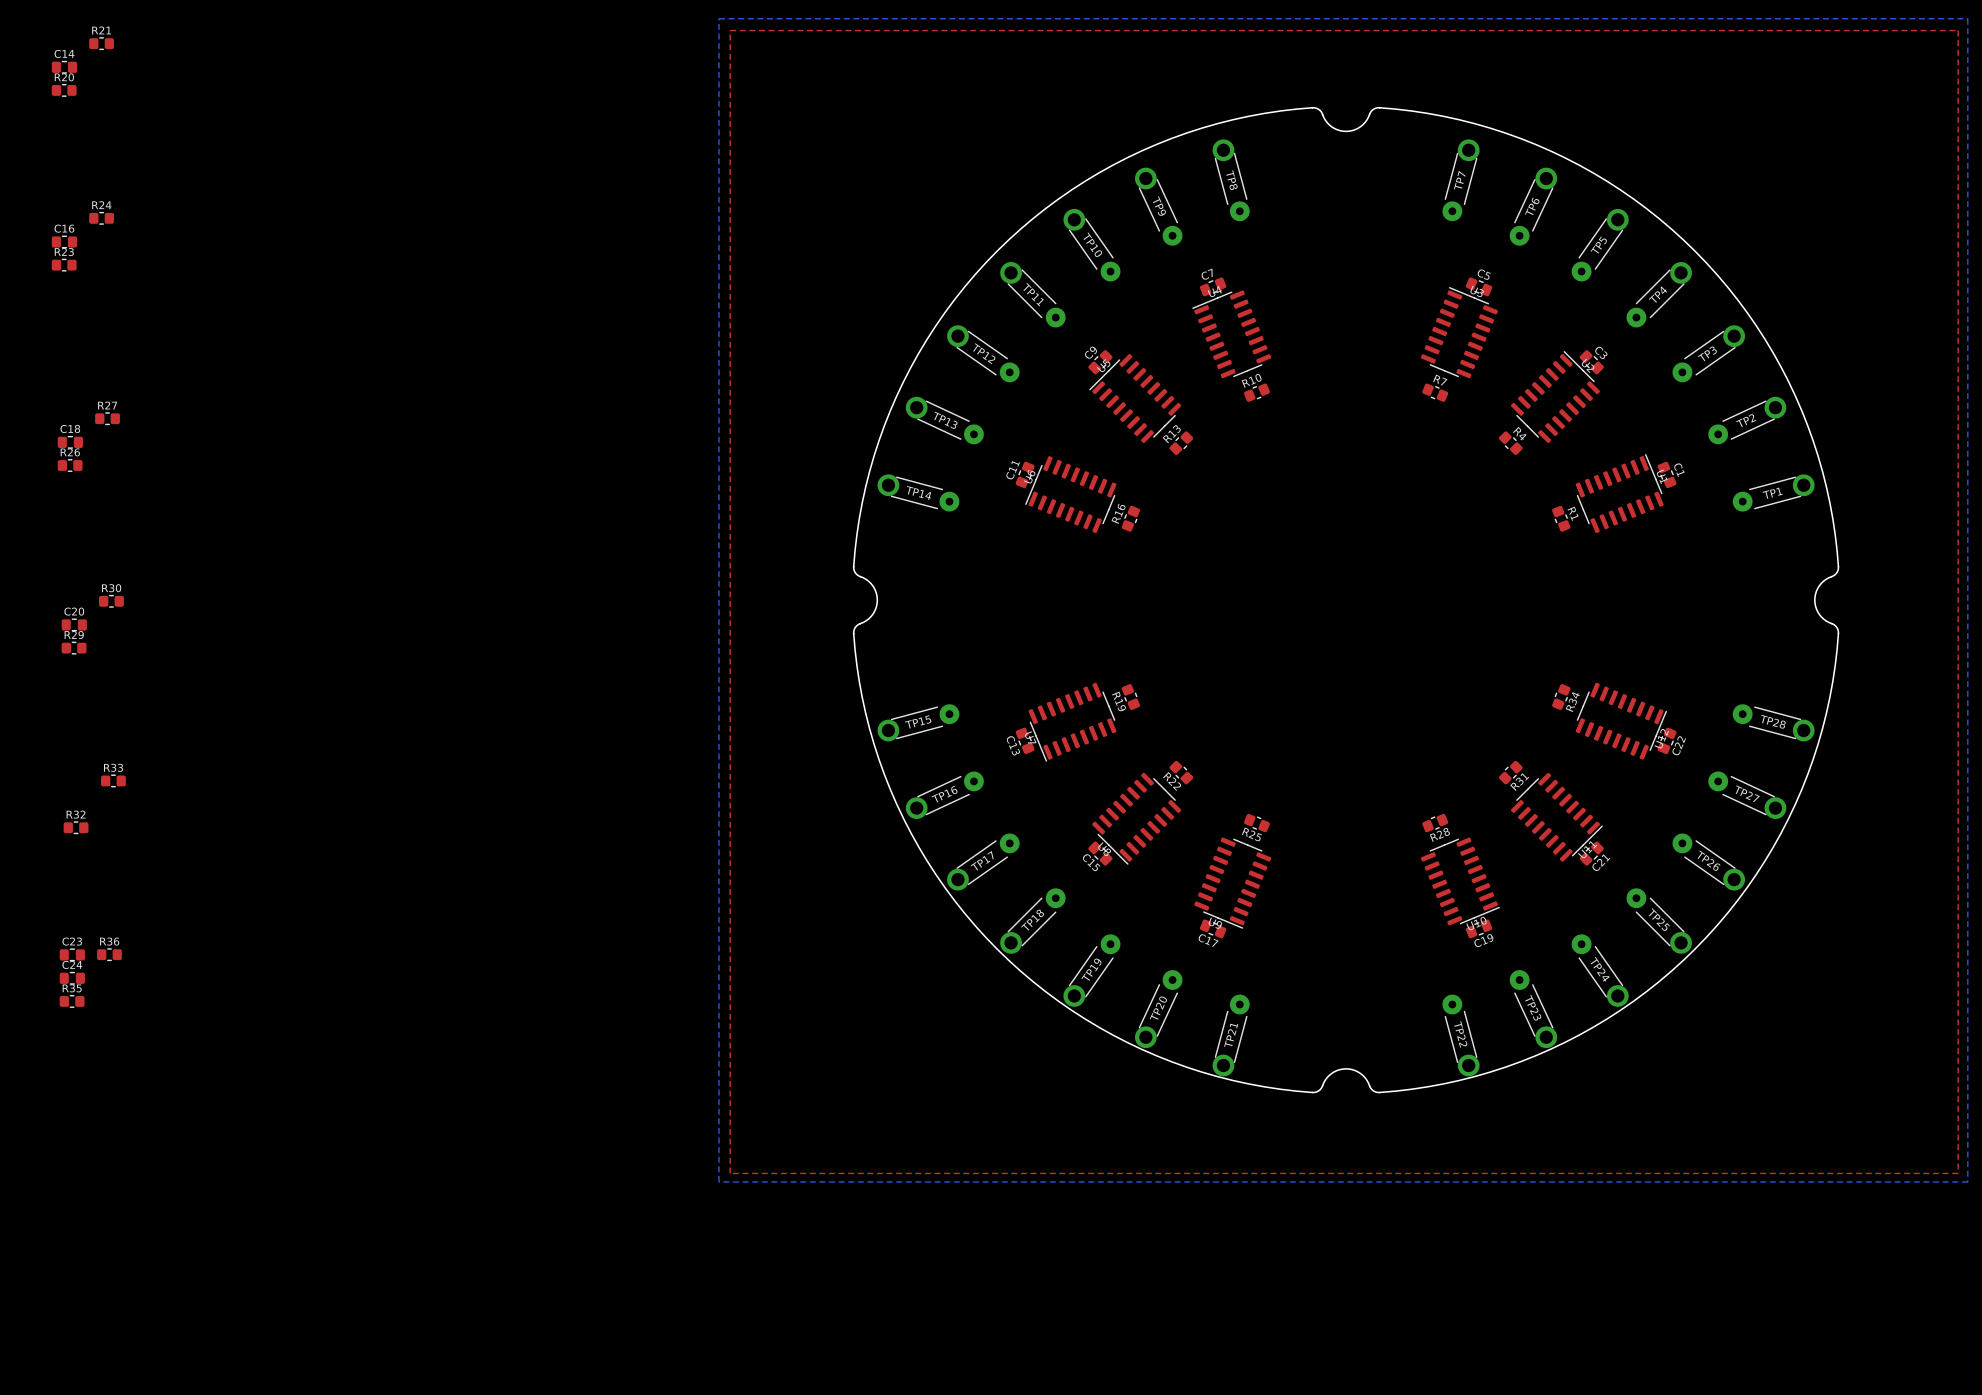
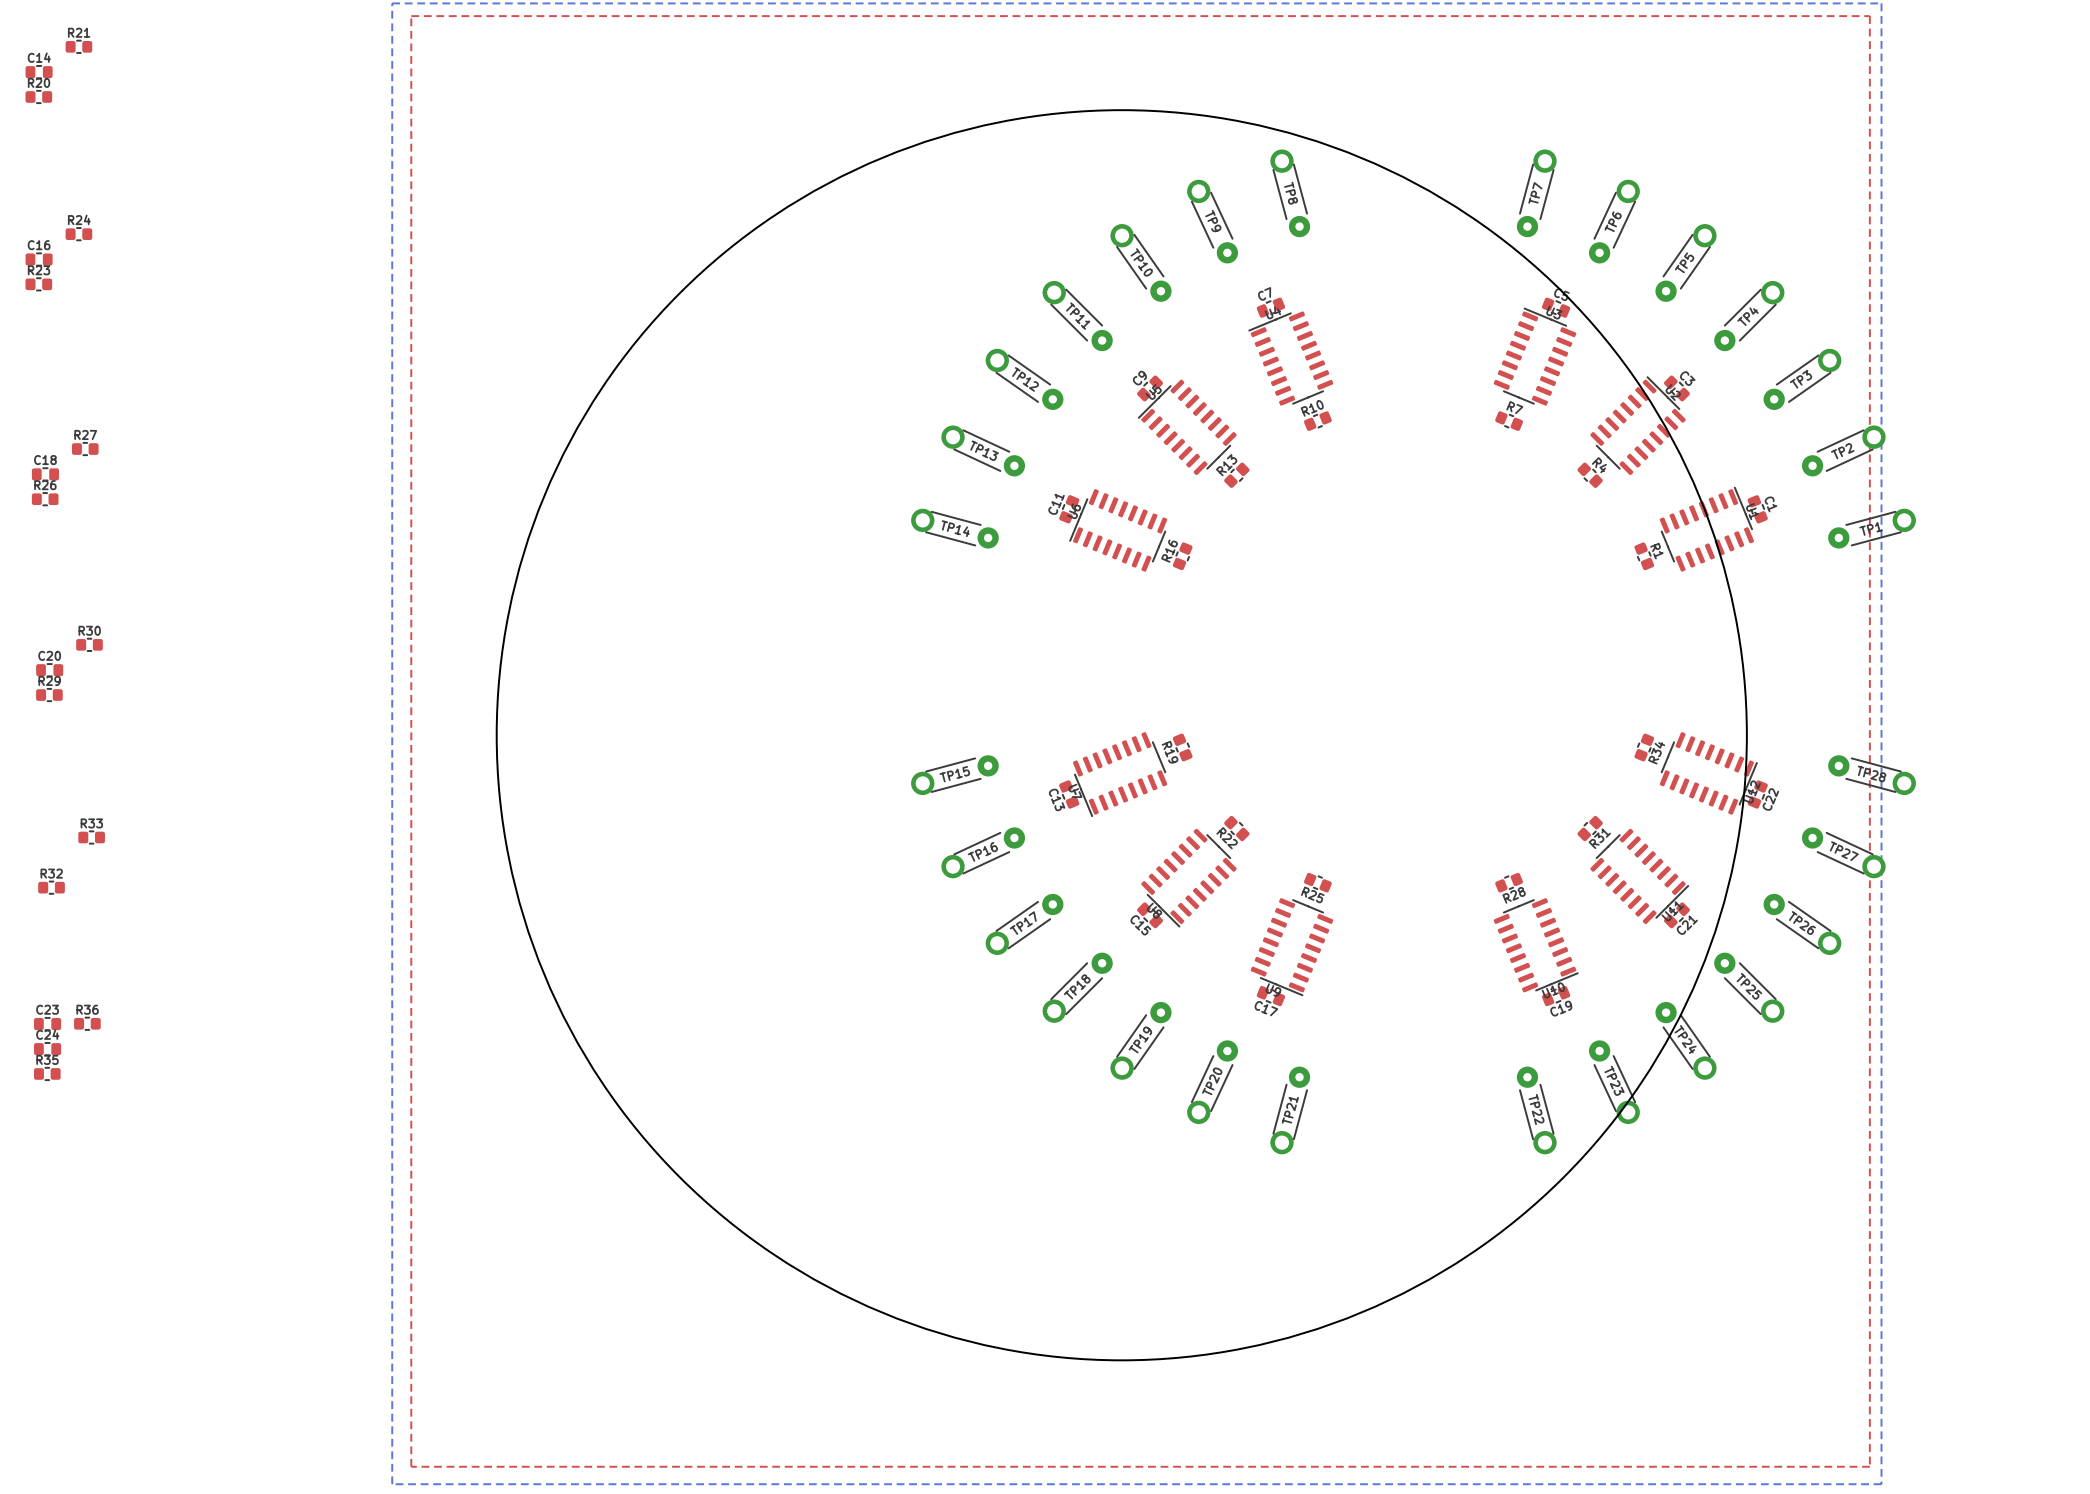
bottom zone outline: (718, 18) (718, 1181) (1967, 1181) (1967, 18) (718, 18) -> (392, 3) (392, 1484) (1881, 1484) (1881, 3) (392, 3)
top zone outline: (730, 30) (730, 1173) (1958, 1173) (1958, 30) (730, 30) -> (411, 16) (411, 1466) (1869, 1466) (1869, 16) (411, 16)
round board edge: none -> [496, 109, 1748, 1361]
board edge: (1312, 107) (1264, 113) (1217, 123) (1171, 138) (1127, 157) (1085, 181) (1045, 208) (1008, 239) (975, 274) (945, 312) (918, 352) (896, 395) (879, 440) (862, 502) (853, 567) (856, 574) (872, 585) (876, 594) (877, 603) (872, 614) (856, 625) (853, 633) (859, 681) (869, 728) (884, 774) (903, 818) (927, 861) (954, 900) (985, 937) (1020, 971) (1058, 1001) (1098, 1027) (1141, 1049) (1186, 1067) (1248, 1083) (1313, 1092) (1320, 1089) (1331, 1073) (1339, 1069) (1349, 1069) (1360, 1073) (1371, 1089) (1379, 1092) (1427, 1086) (1474, 1076) (1520, 1061) (1564, 1042) (1607, 1019) (1646, 991) (1683, 960) (1717, 925) (1747, 887) (1773, 847) (1795, 804) (1813, 759) (1829, 697) (1838, 632) (1835, 625) (1819, 614) (1815, 606) (1815, 597) (1819, 585) (1835, 574) (1838, 566) (1832, 518) (1822, 471) (1807, 425) (1788, 381) (1764, 339) (1737, 299) (1706, 262) (1671, 229) (1633, 199) (1593, 172) (1550, 150) (1505, 133) (1443, 116) (1378, 107) (1371, 110) (1360, 126) (1352, 130) (1342, 131) (1331, 126) (1320, 110) (1312, 107) -> none

